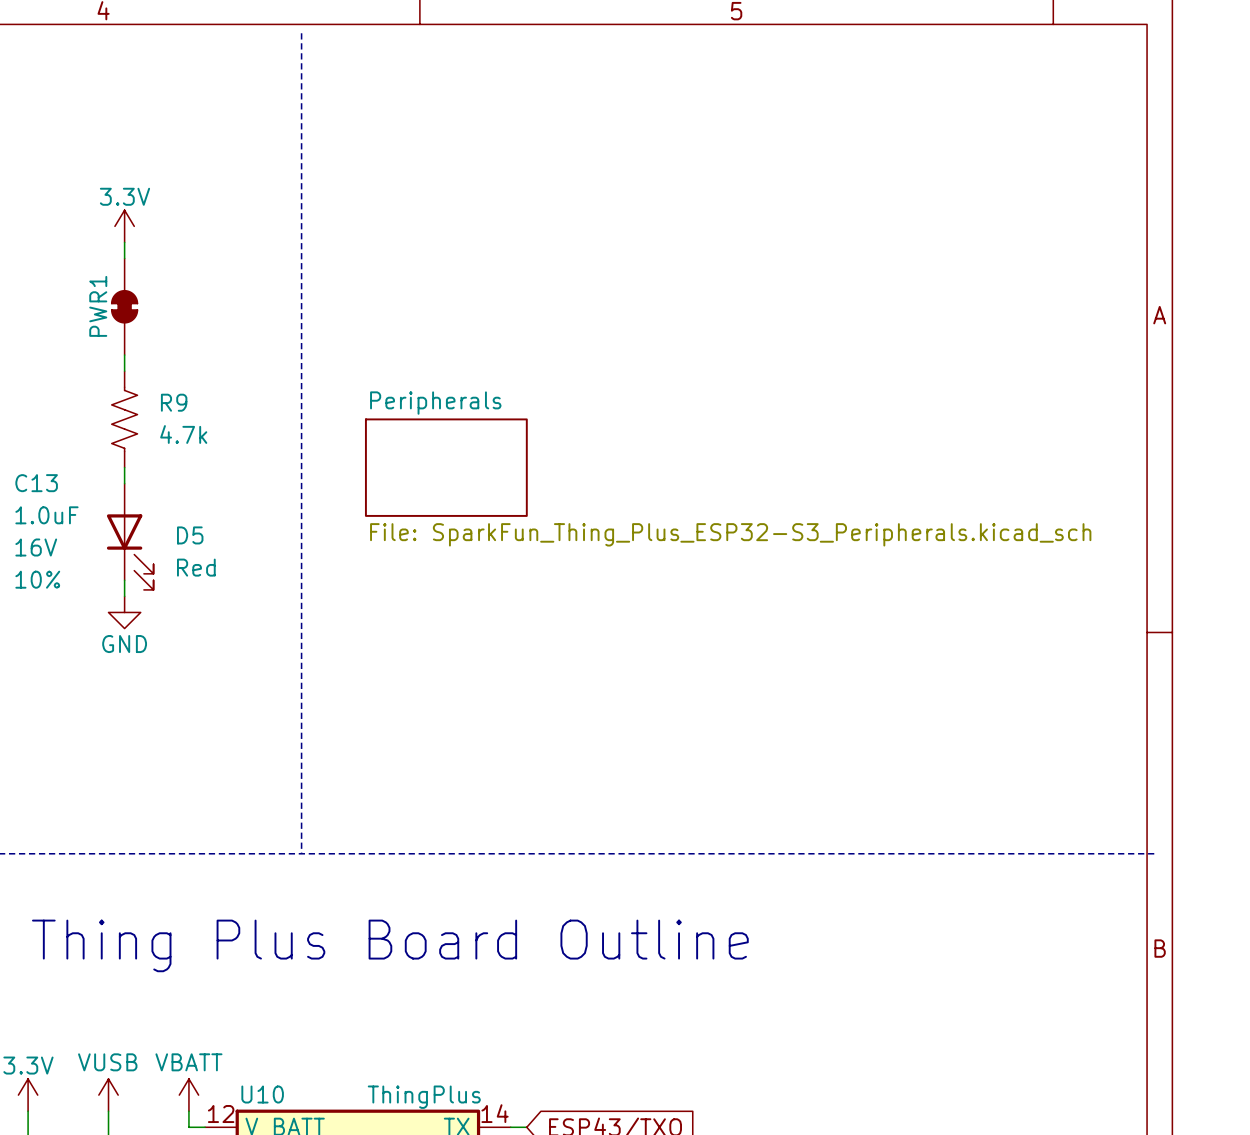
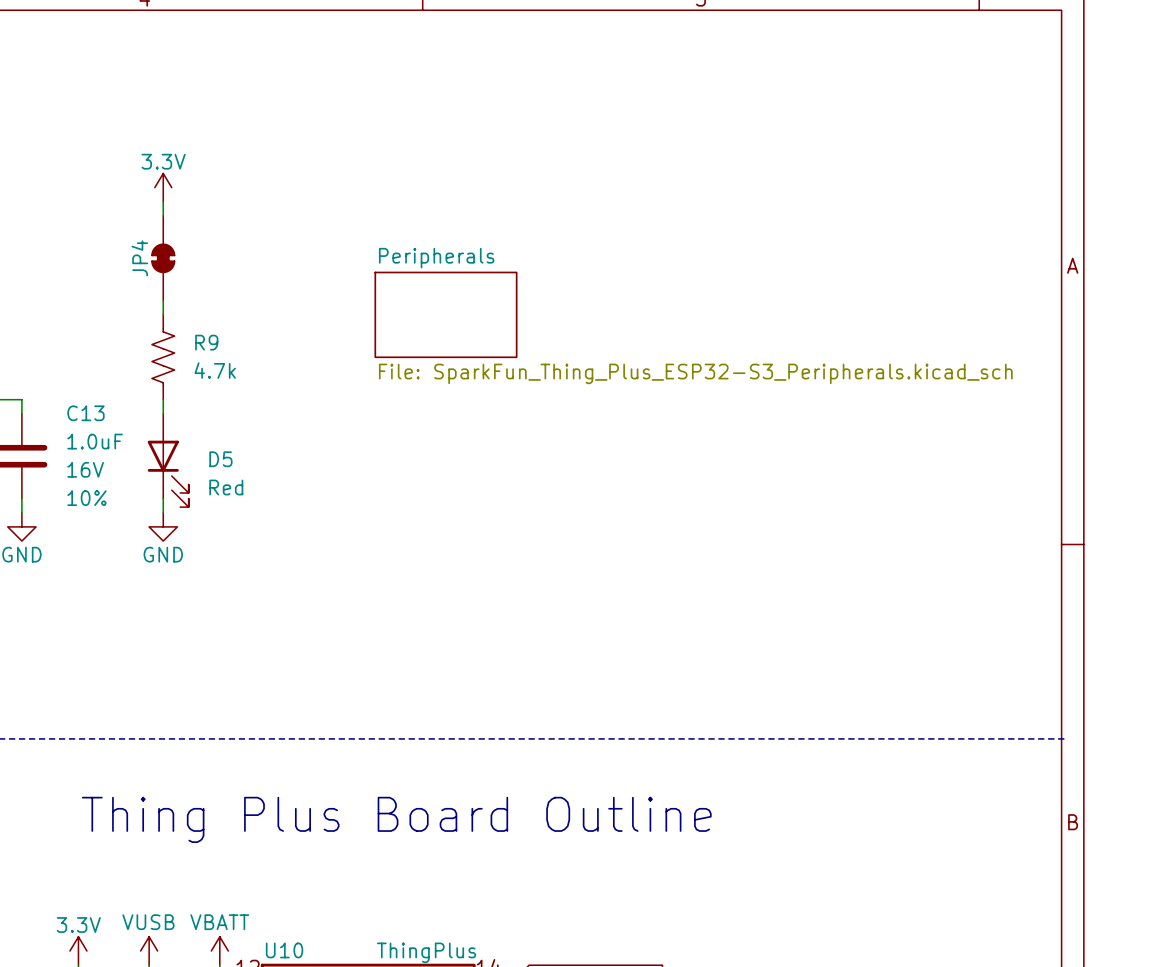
line: (301, 33) (301, 853) -> none
PWR1 name: PWR1 (98, 306) -> JP4 (139, 258)
sheet Peripherals position: (446, 467) -> (445, 314)

